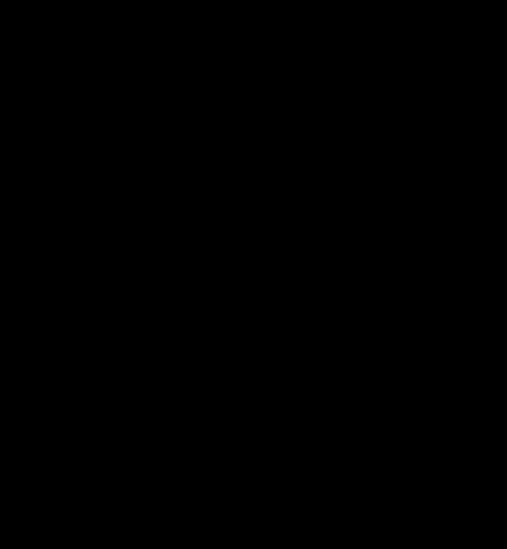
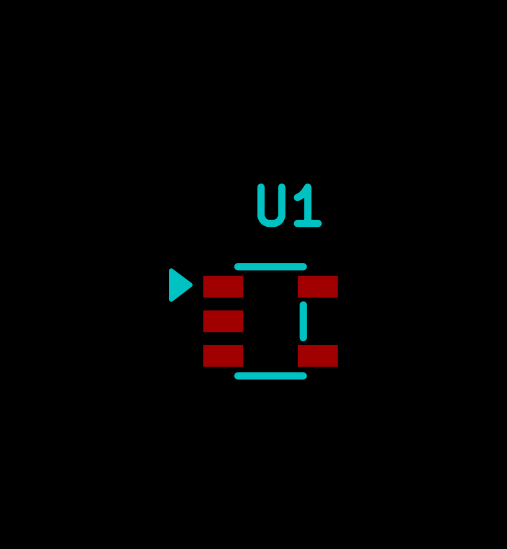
U1: none -> (253, 321)

